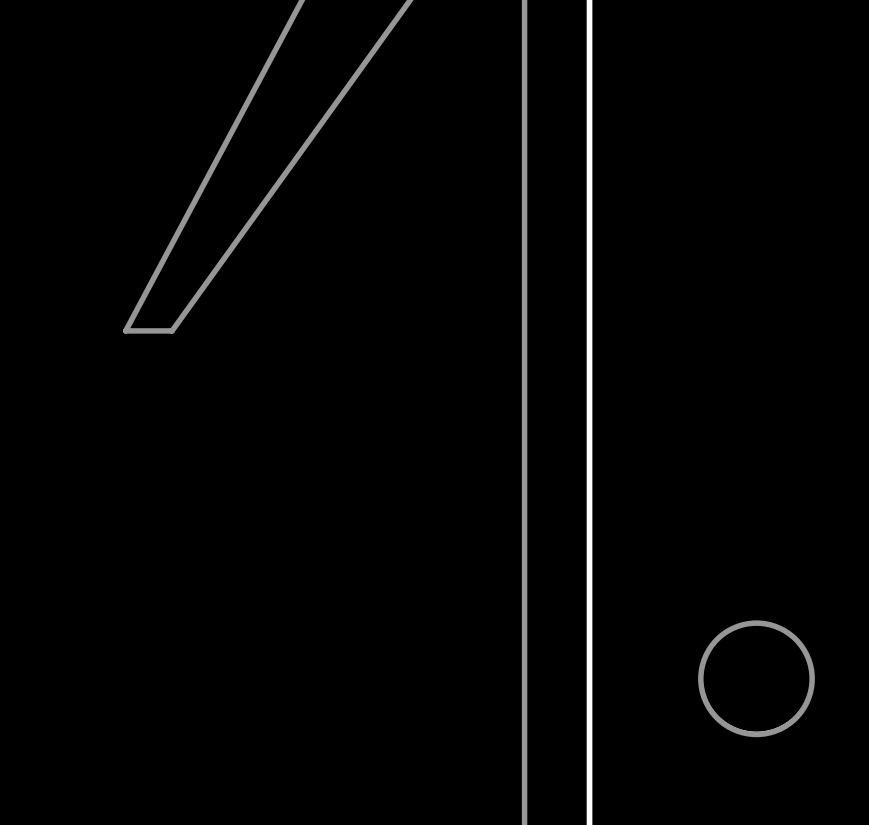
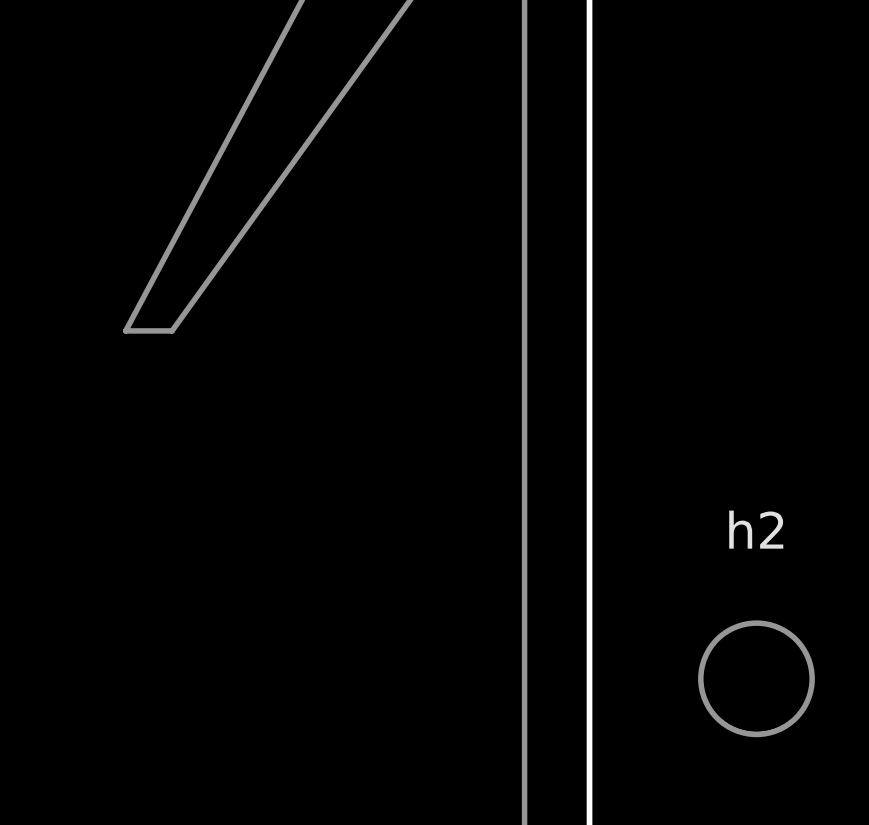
h2 name: none -> h2 (756, 529)

